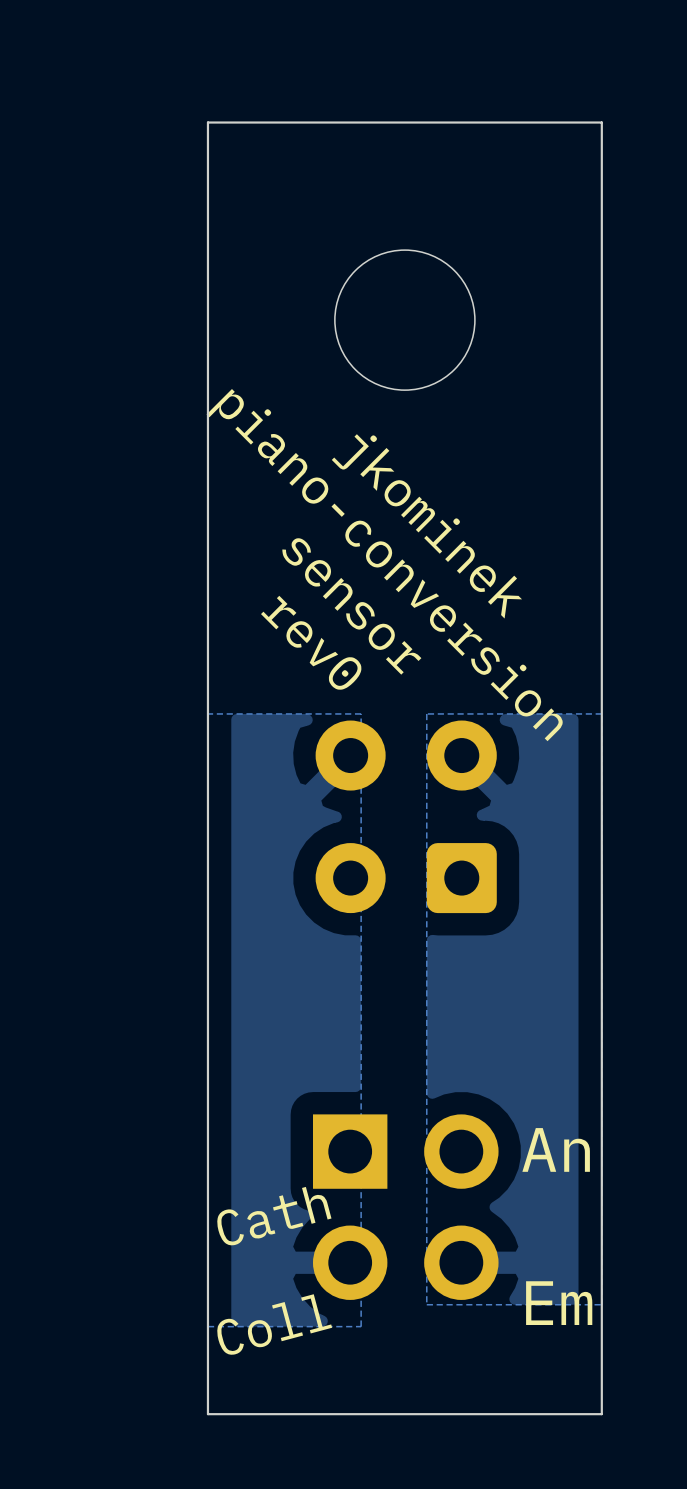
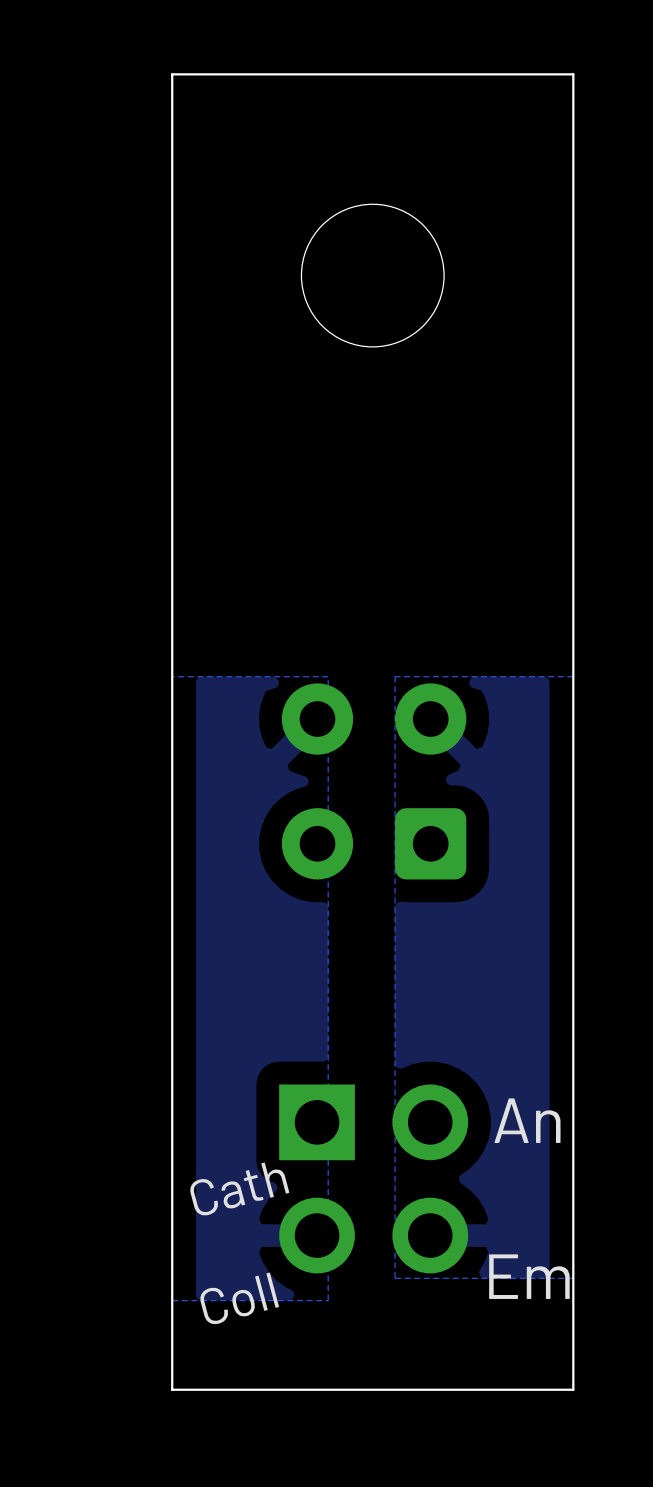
text: jkominek (426, 526) -> none
text: piano-conversion (384, 565) -> none
text: sensor (351, 606) -> none
text: rev0 (311, 642) -> none

